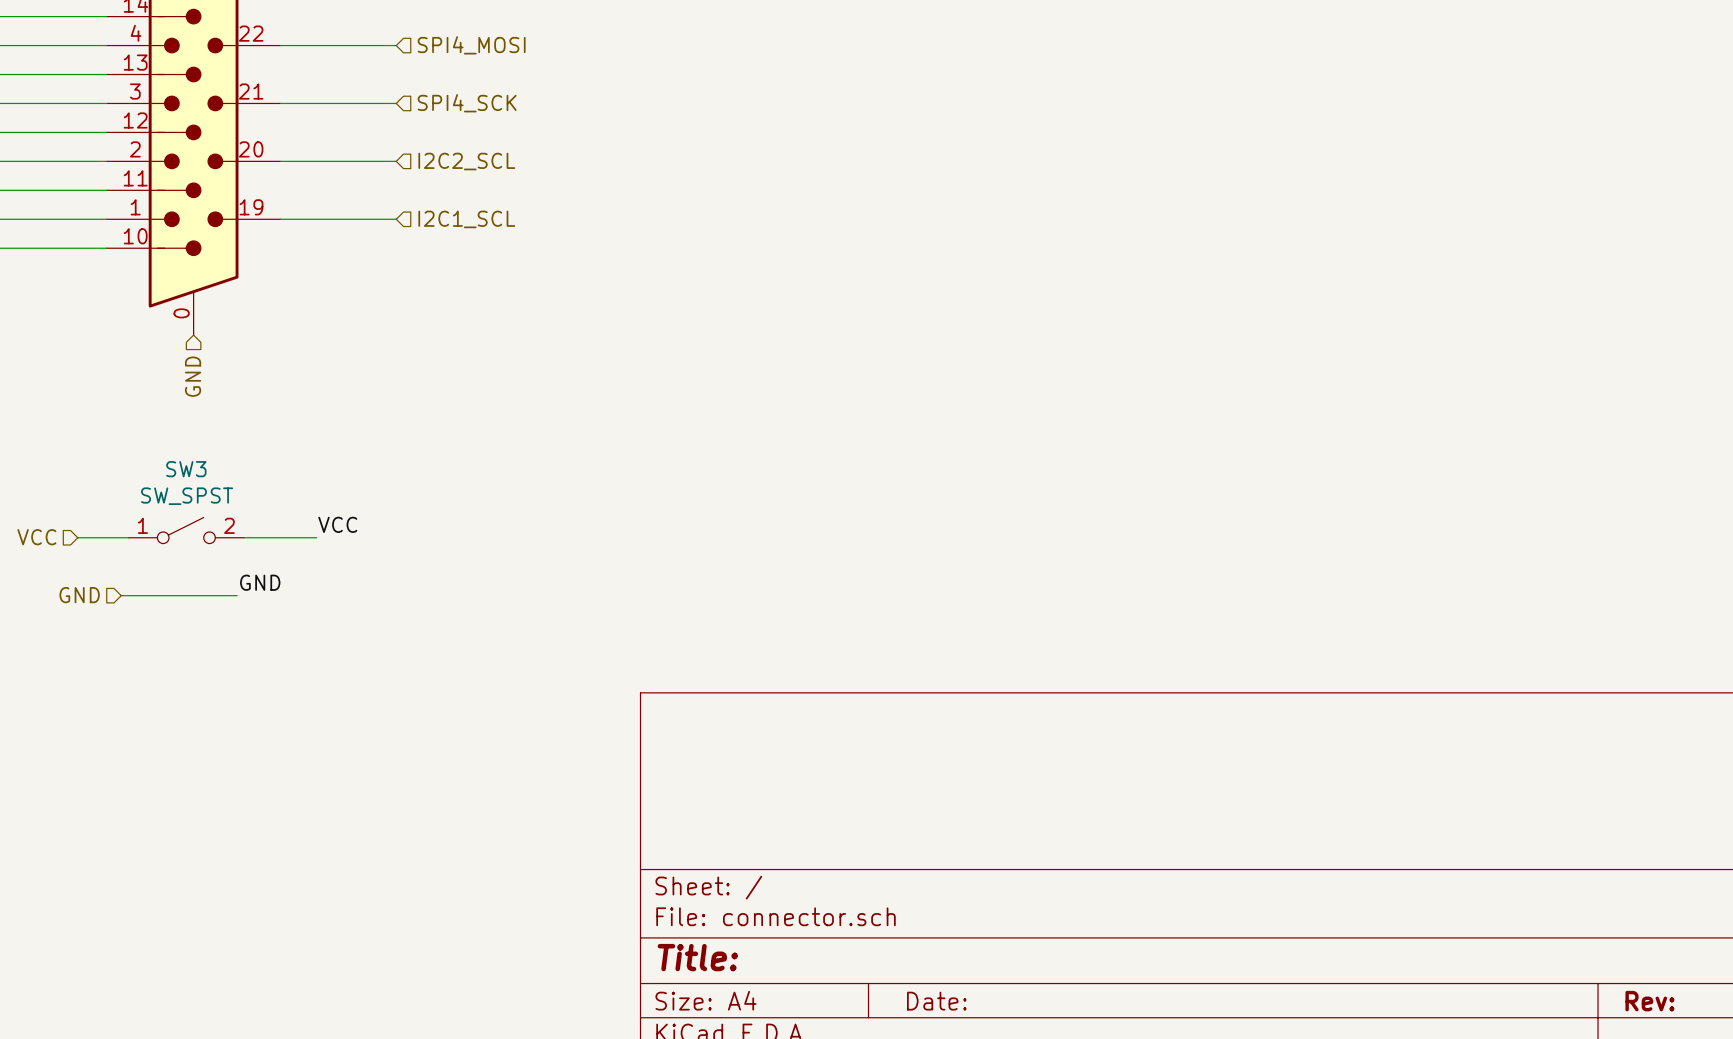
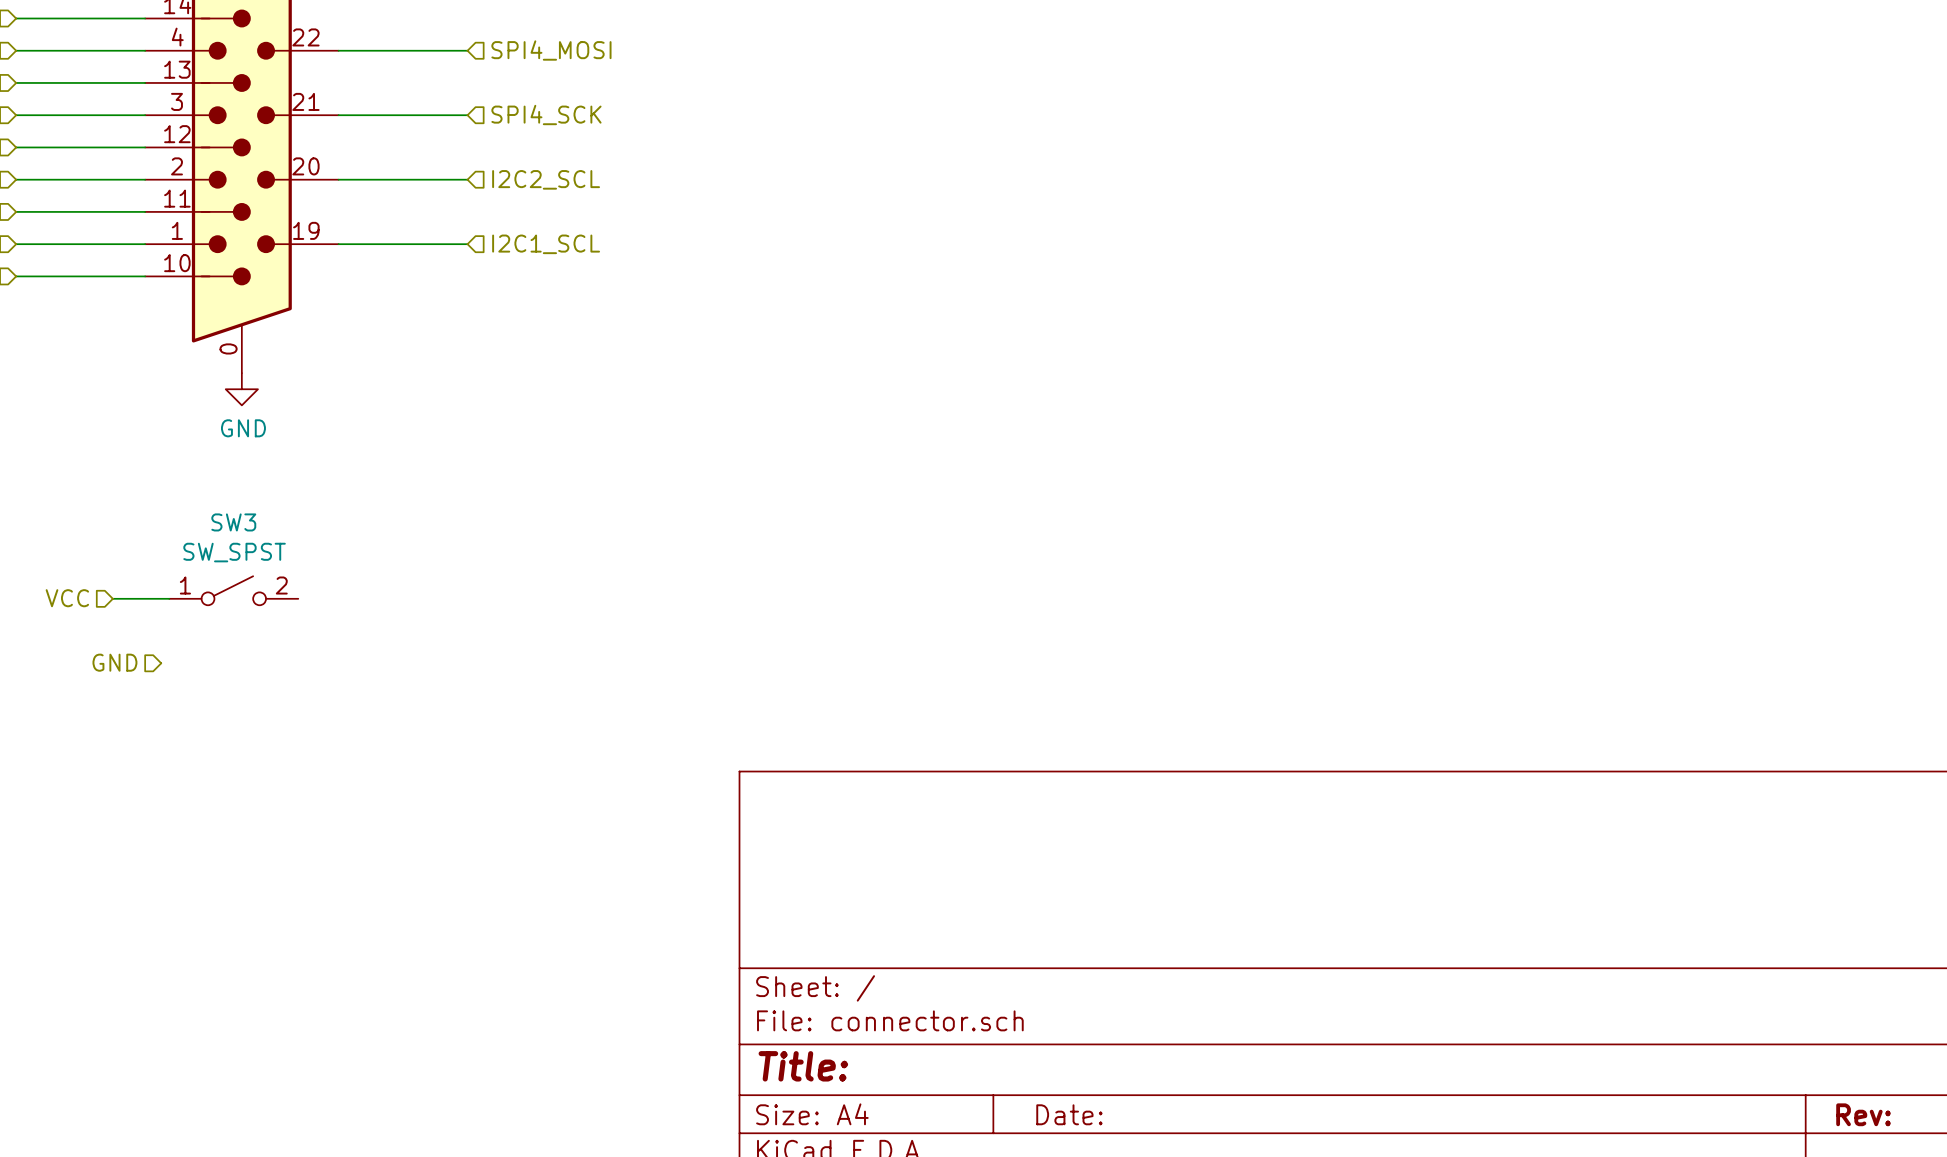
power symbol: none -> GND (241, 389)
hierarchical label: GND (193, 376) -> none
label: VCC (337, 524) -> none
wire: (244, 537) (316, 537) -> none
label: GND (260, 582) -> none
wire: (121, 595) (237, 595) -> none

